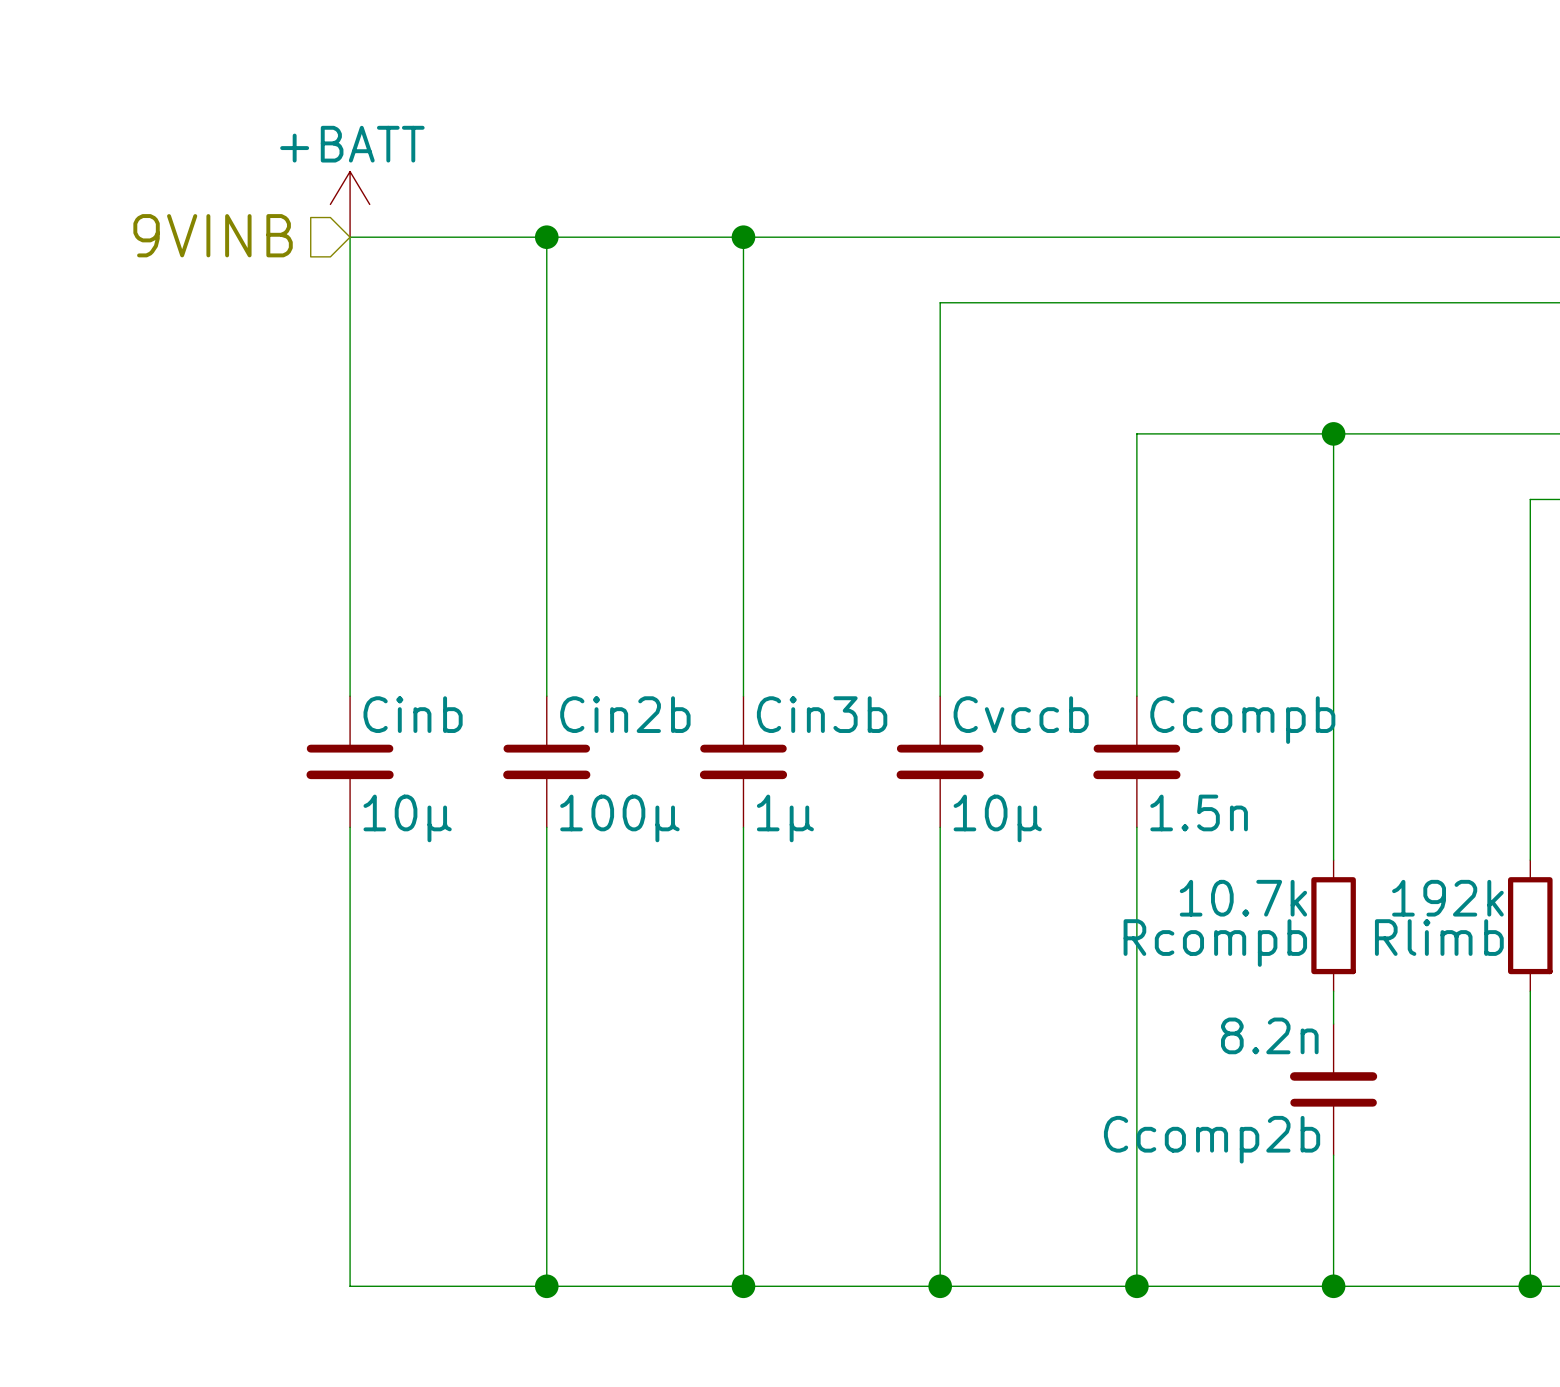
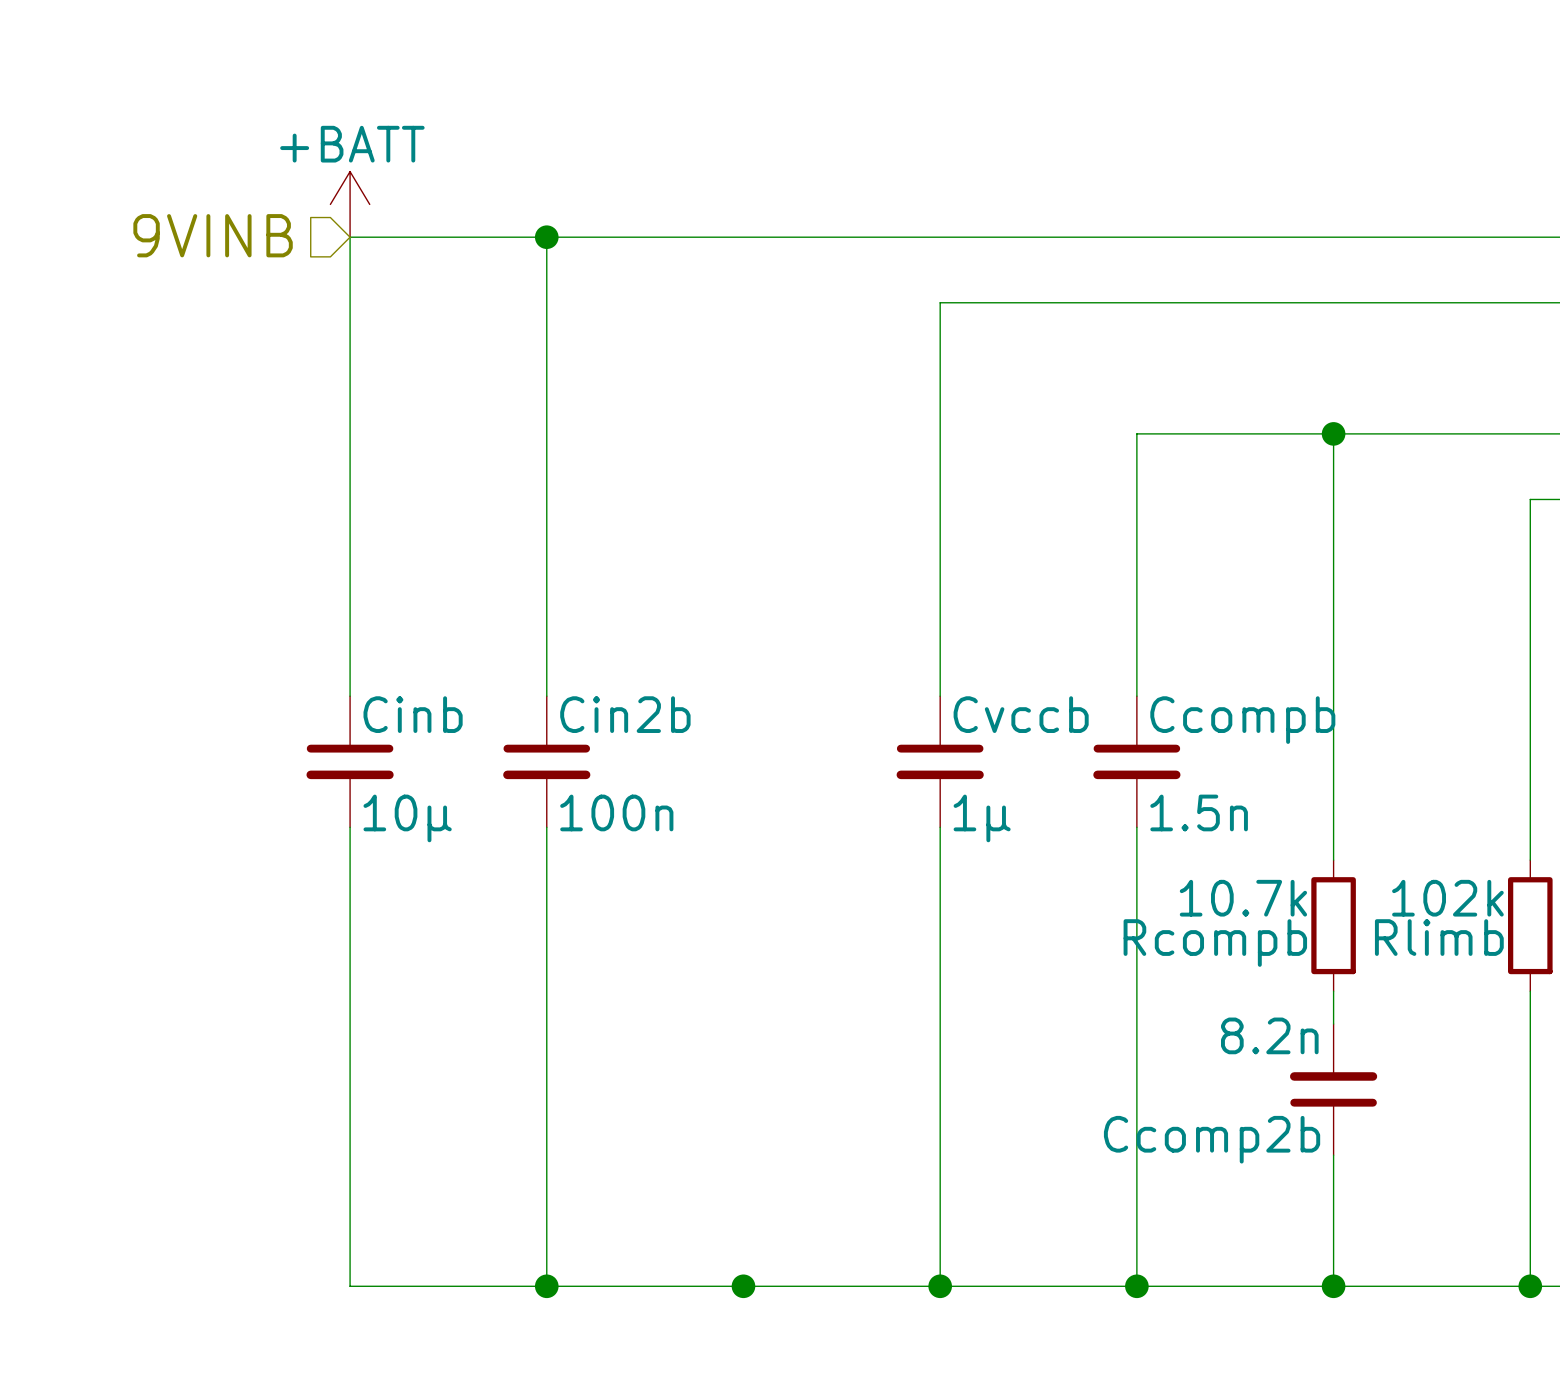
wire: (743, 237) (743, 696) -> none
junction: (743, 237) -> none
Cin3b: 1µ (743, 761) -> none
Cin2b value: 100µ (619, 818) -> 100n (616, 812)
Cvccb value: 10µ (997, 818) -> 1µ (982, 818)
wire: (743, 827) (743, 1286) -> none
Rlimb value: 192k (1447, 898) -> 102k (1447, 898)

